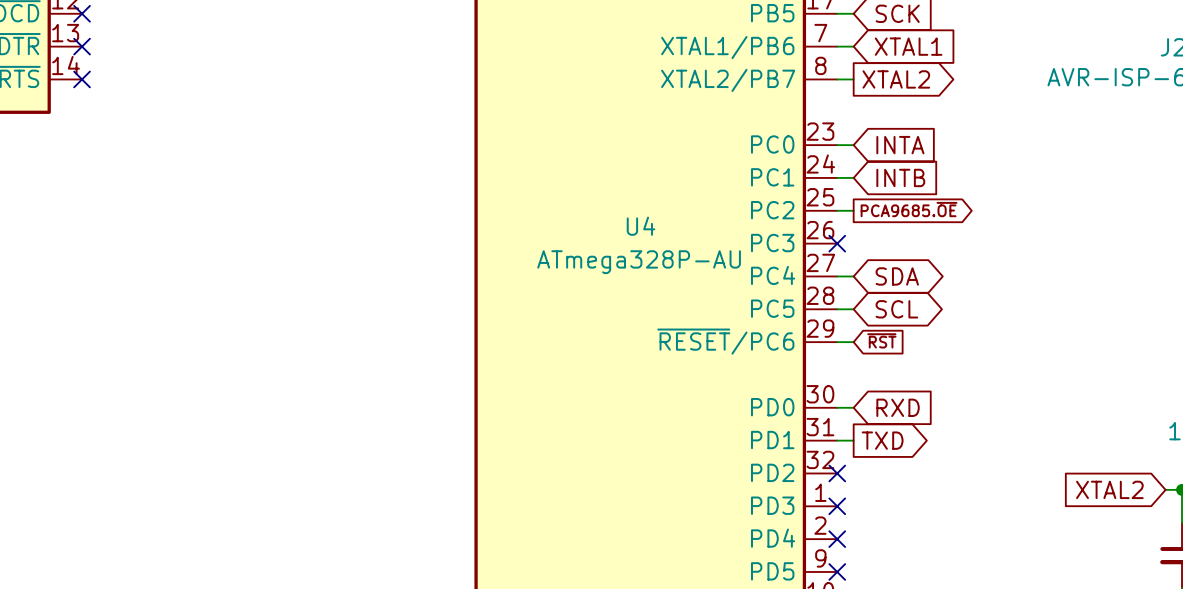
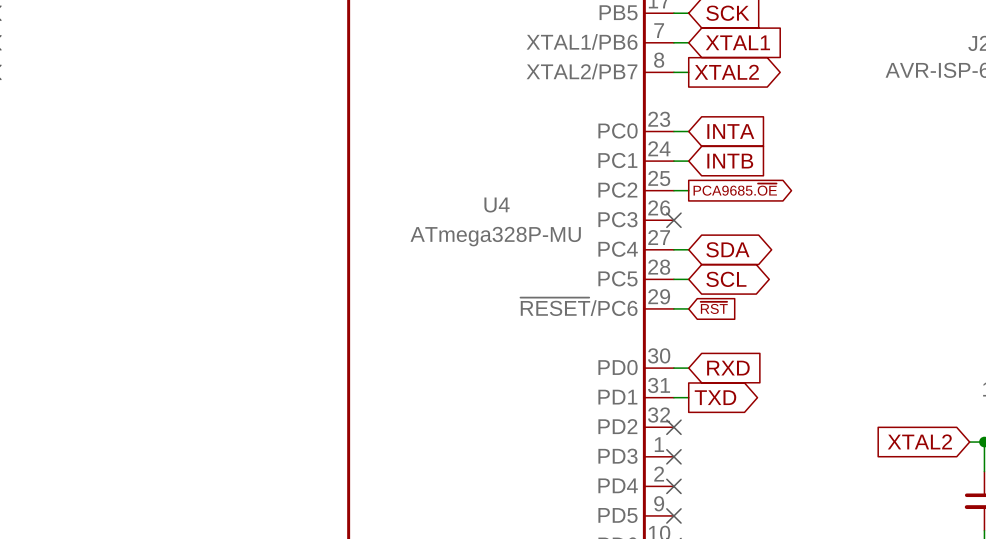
U4 value: ATmega328P-AU (639, 262) -> ATmega328P-MU (495, 236)

